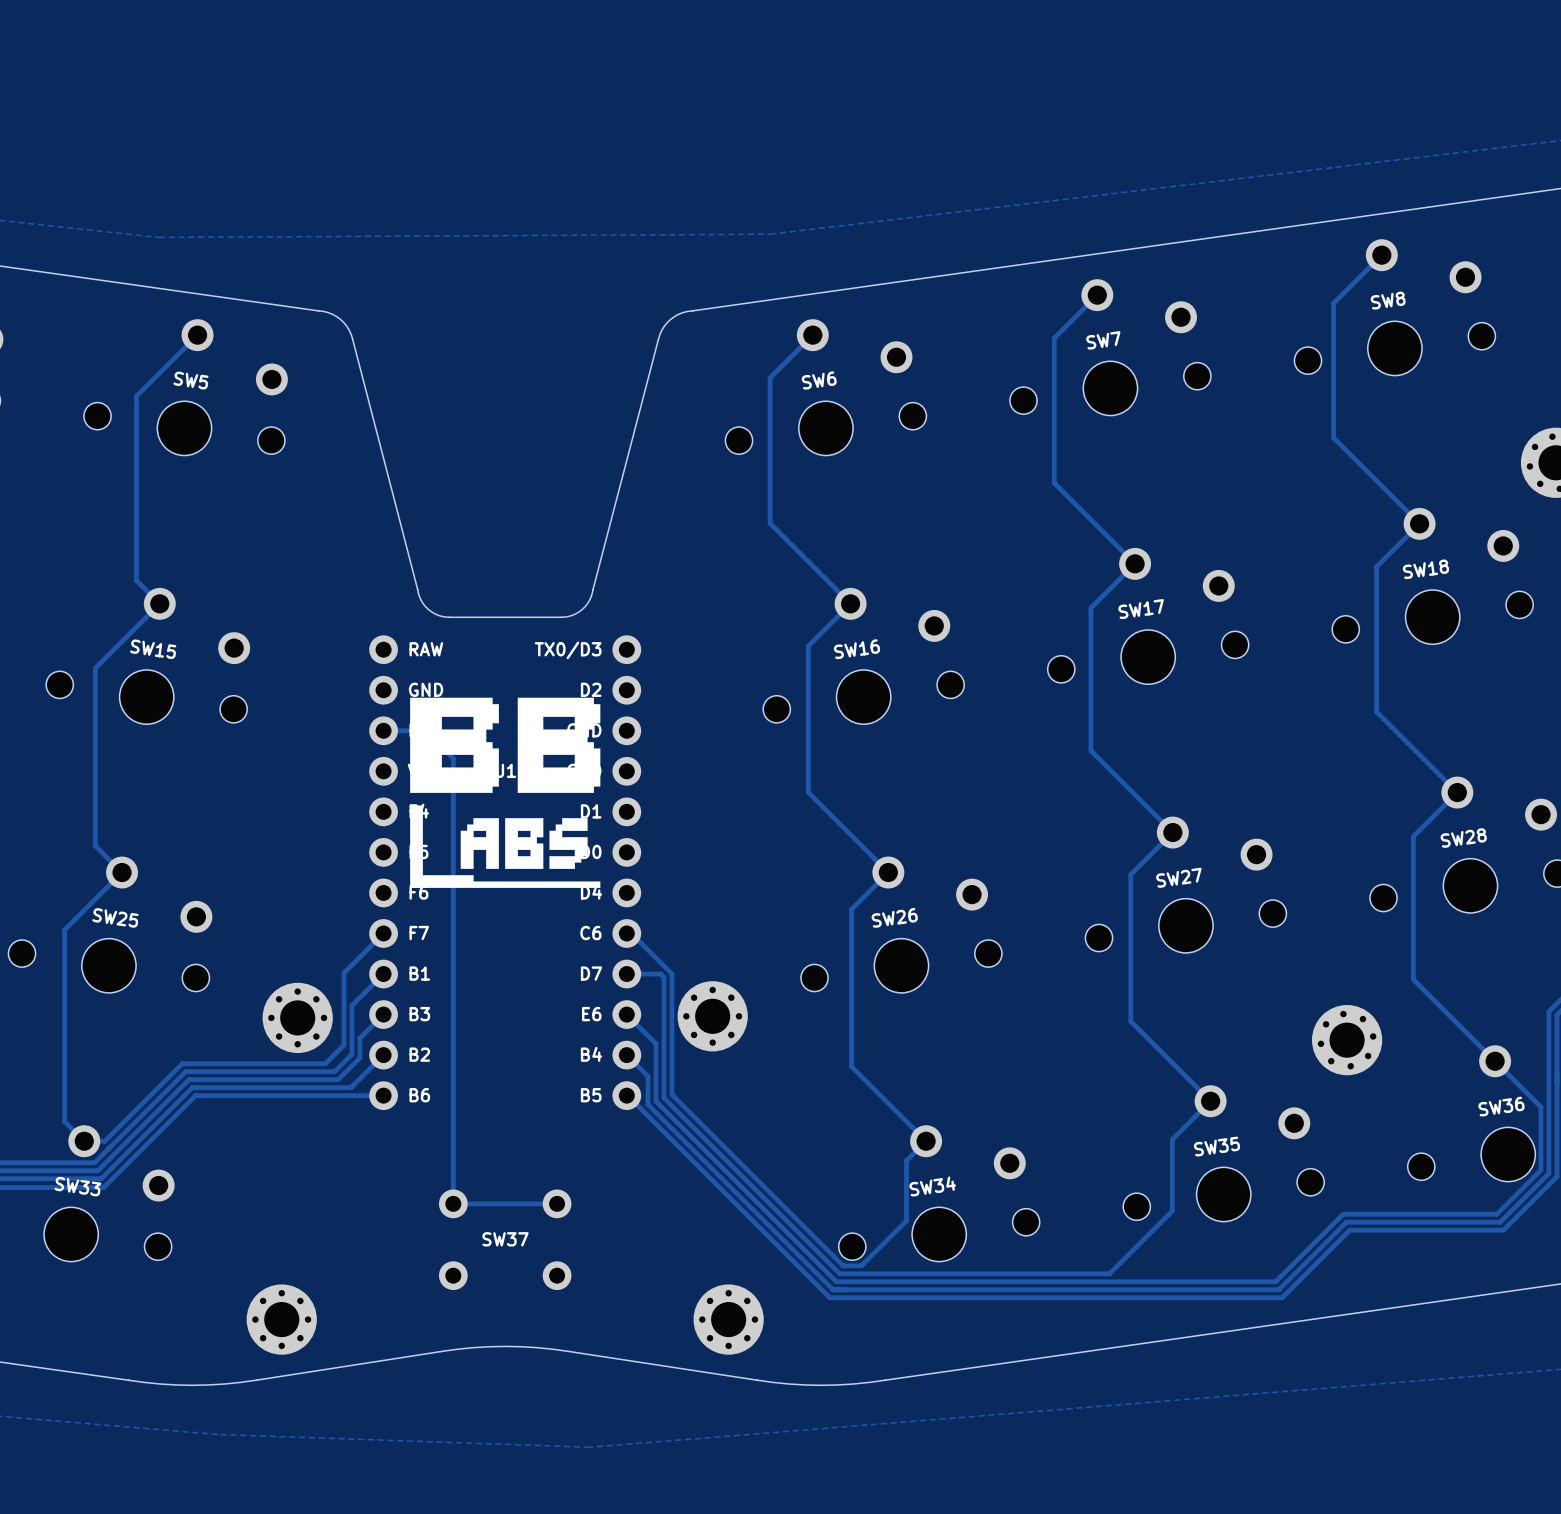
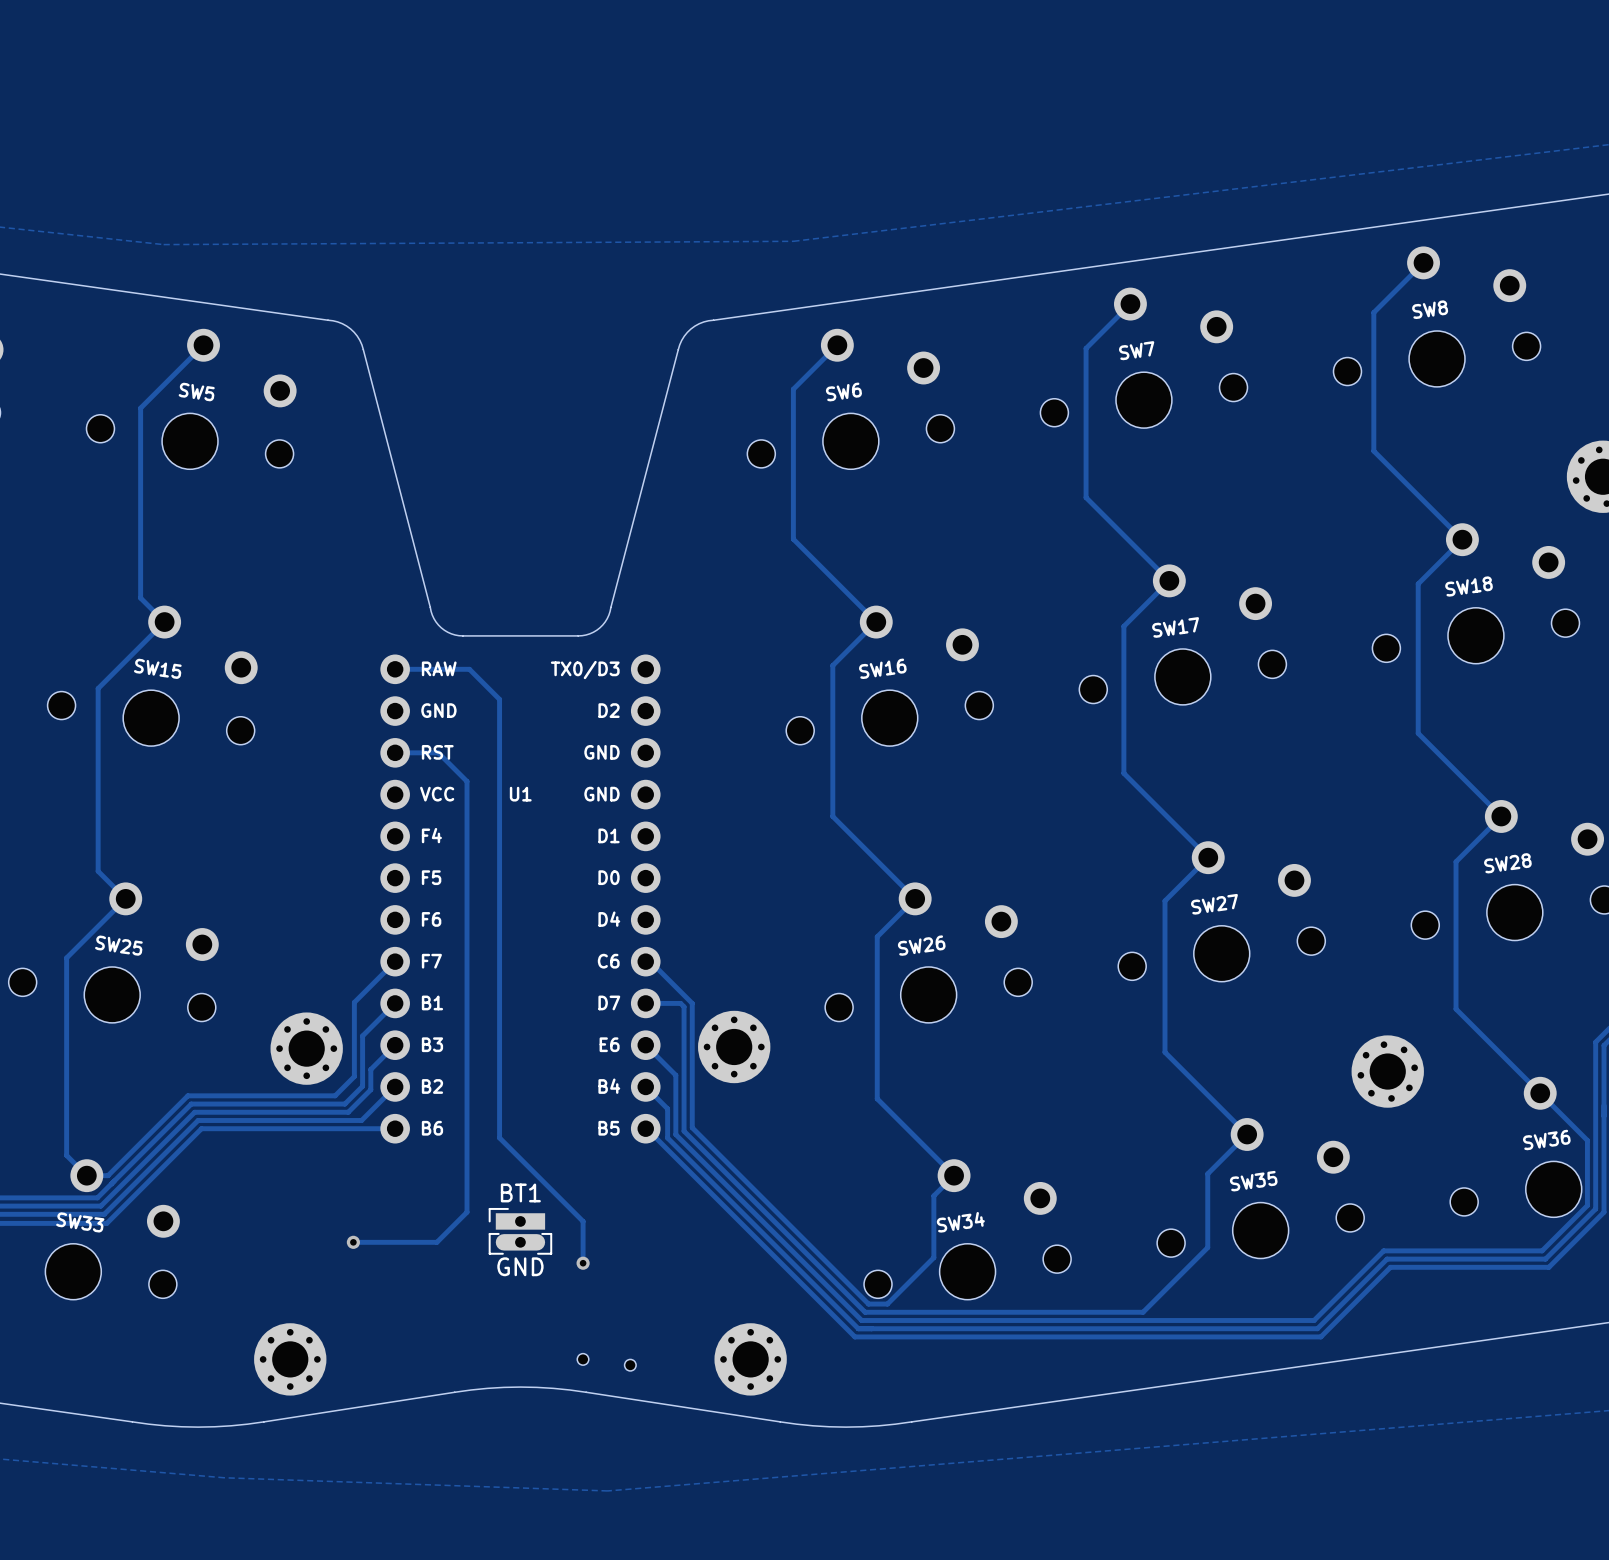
track: none -> (395, 669) (469, 669) (499, 699) (499, 1137) (583, 1221) (583, 1263)
drawing: [410, 697, 601, 888] -> none
track: (453, 1176) (453, 1203) (557, 1203) -> (467, 1212) (436, 1242) (353, 1242) (355, 1240)
BT1: none -> (520, 1231)
via: none -> (353, 1242)
via: none -> (583, 1263)
SW37: (505, 1239) -> none
part: none -> (606, 1362)

